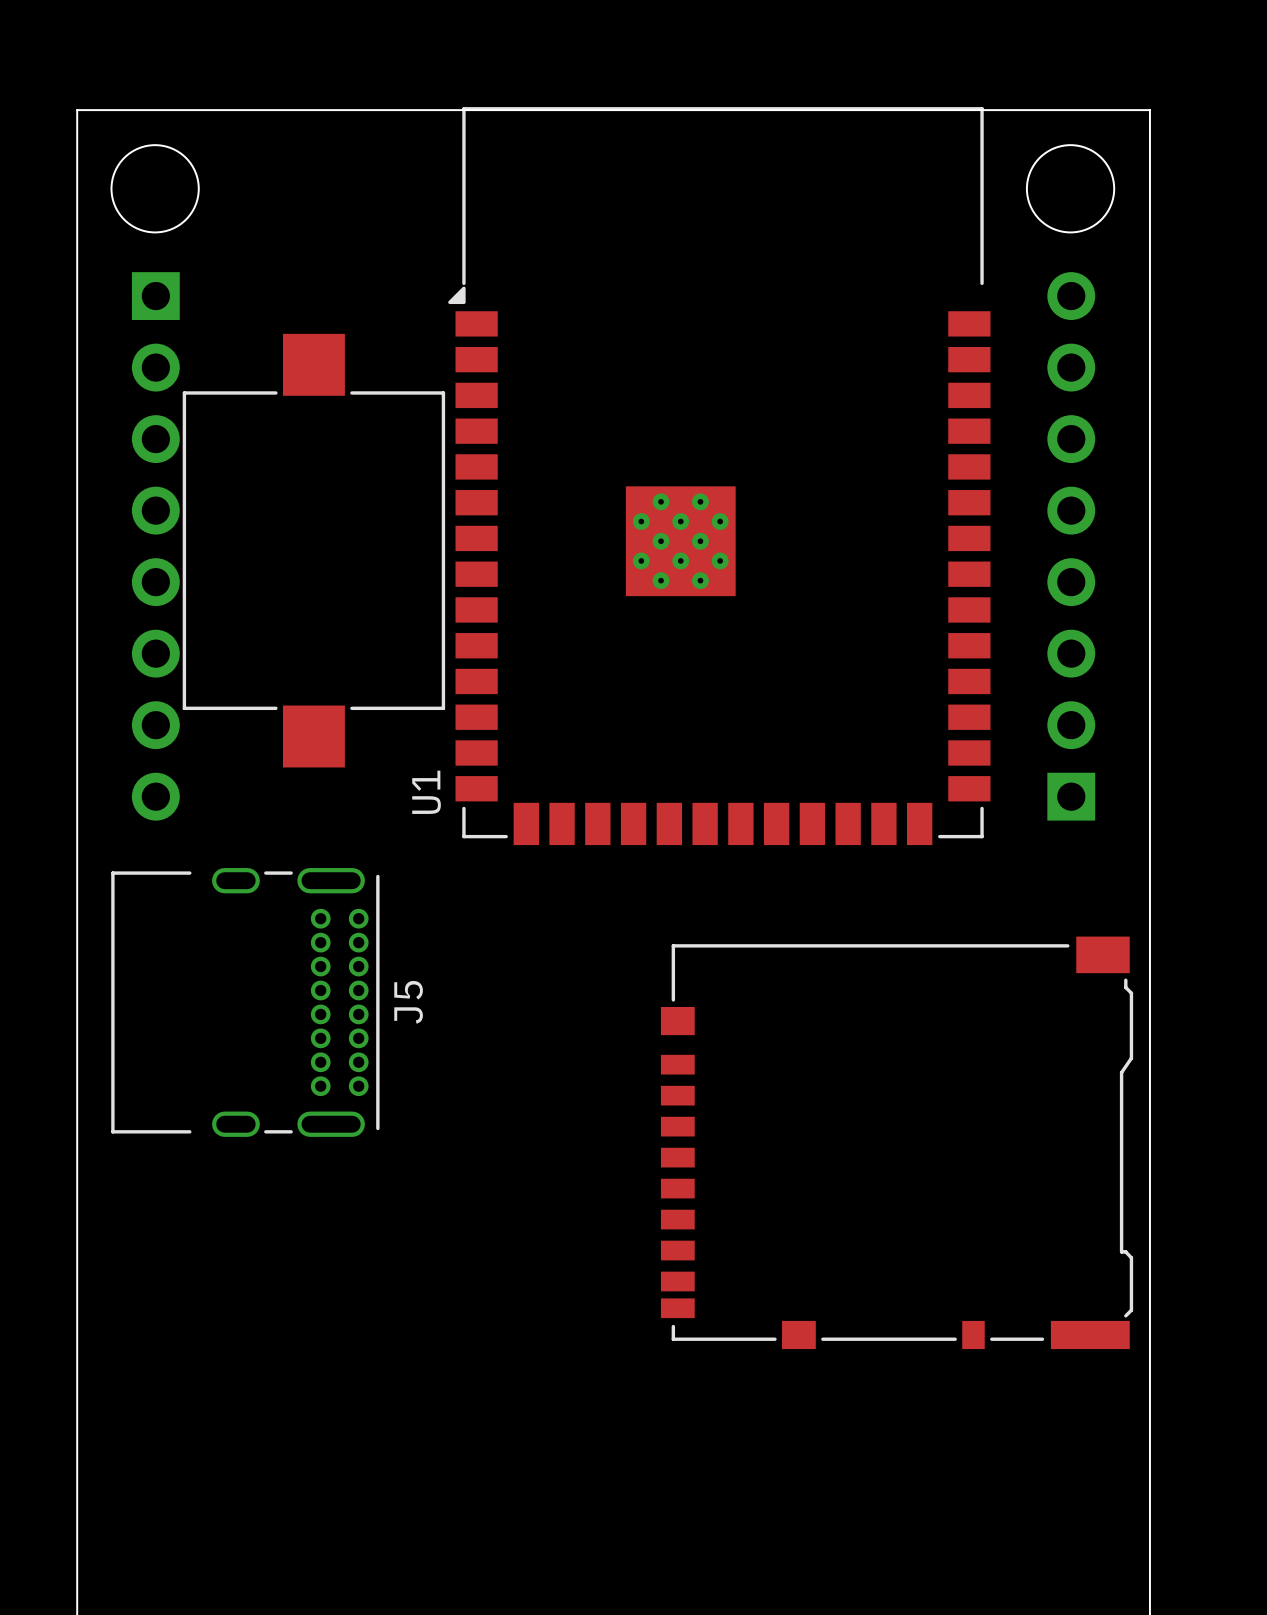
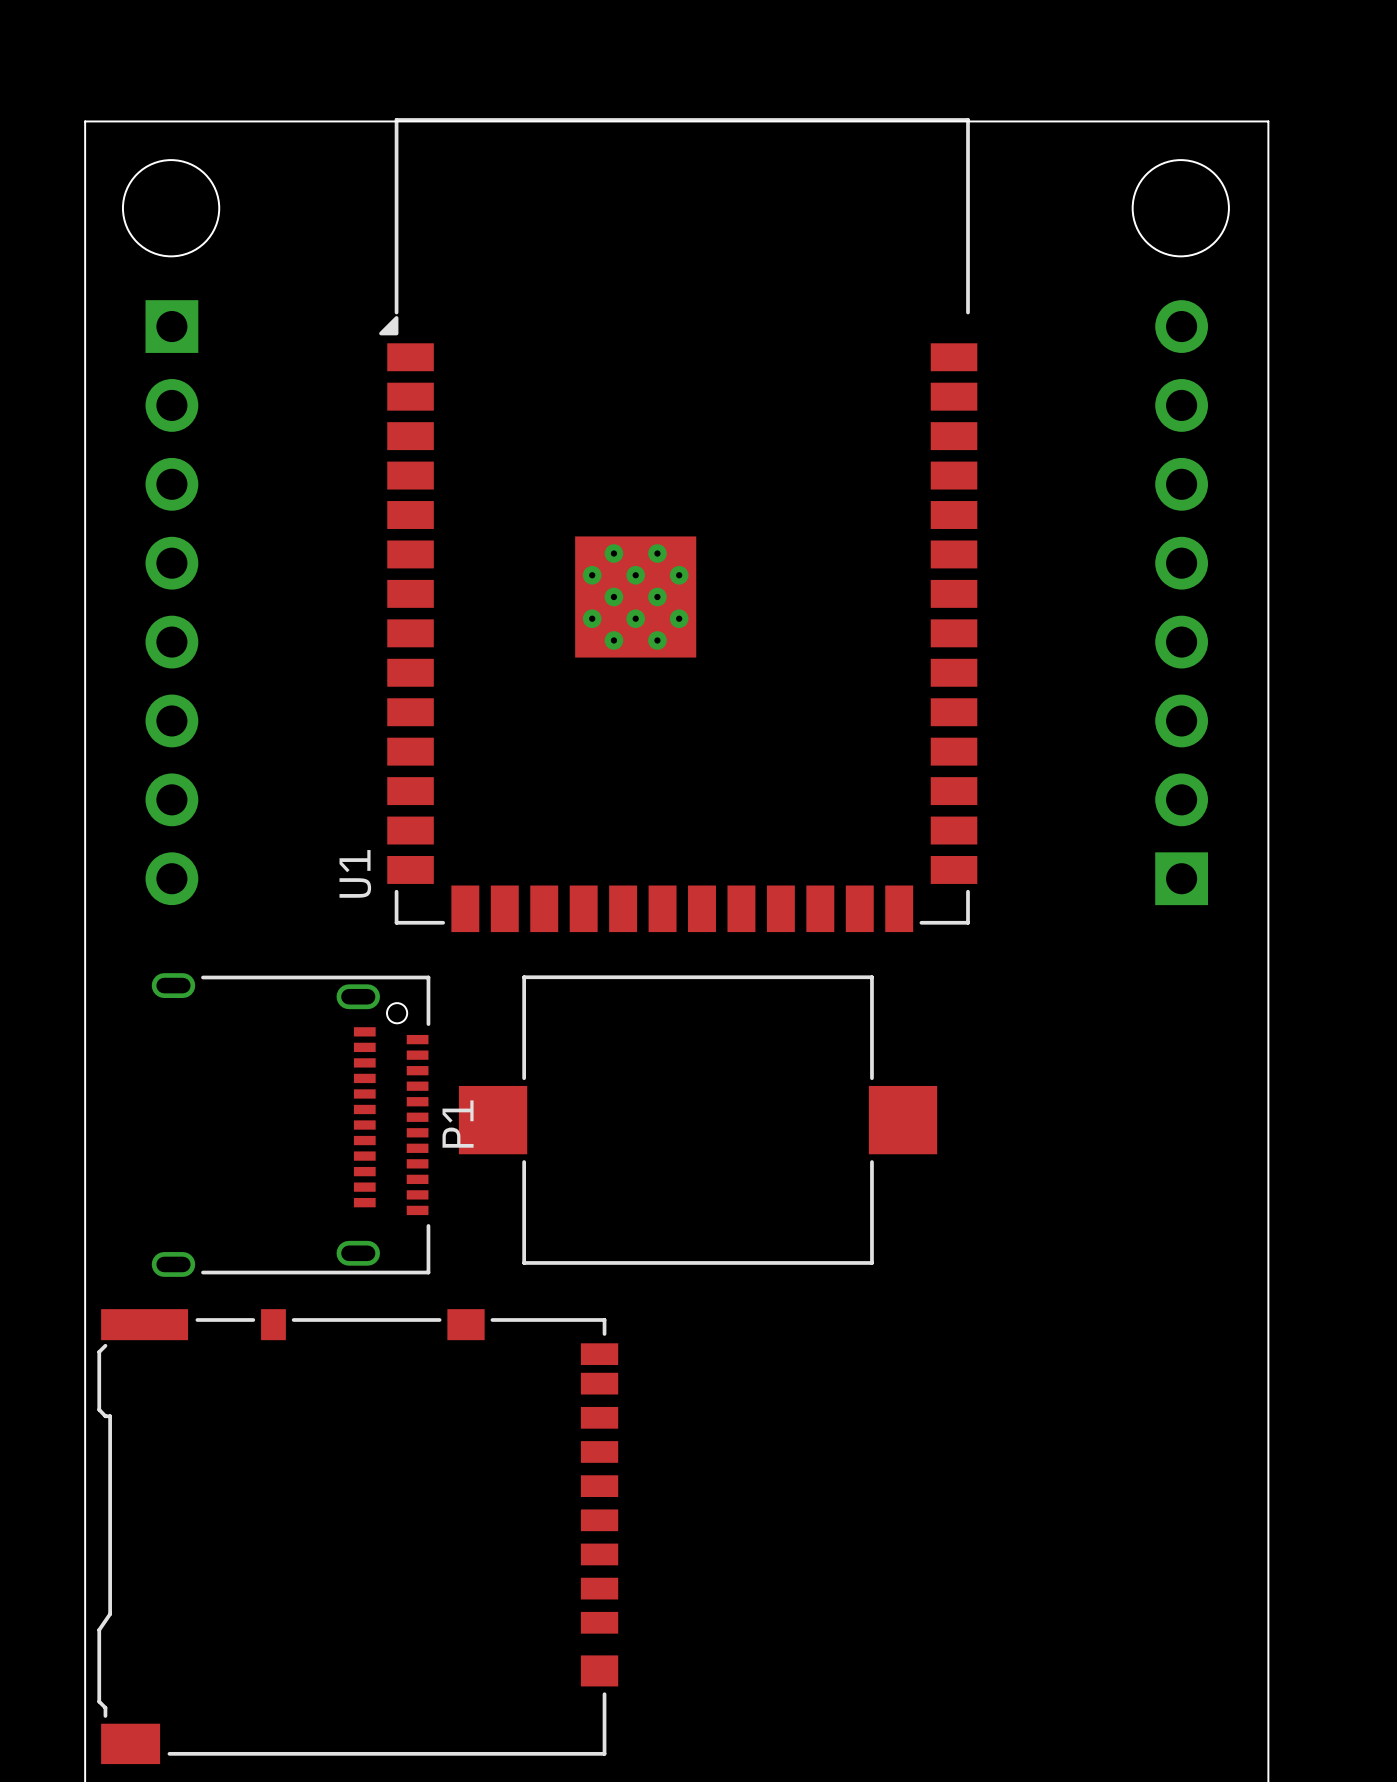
U1 position: (719, 476) -> (678, 525)
part rotation: 0° (313, 550) -> 90° clockwise (698, 1120)
part position: (313, 550) -> (698, 1120)
J5: (245, 1002) -> none
P1: none -> (291, 1125)
part rotation: 0° (897, 1142) -> 180° (357, 1536)
part position: (897, 1142) -> (357, 1536)

